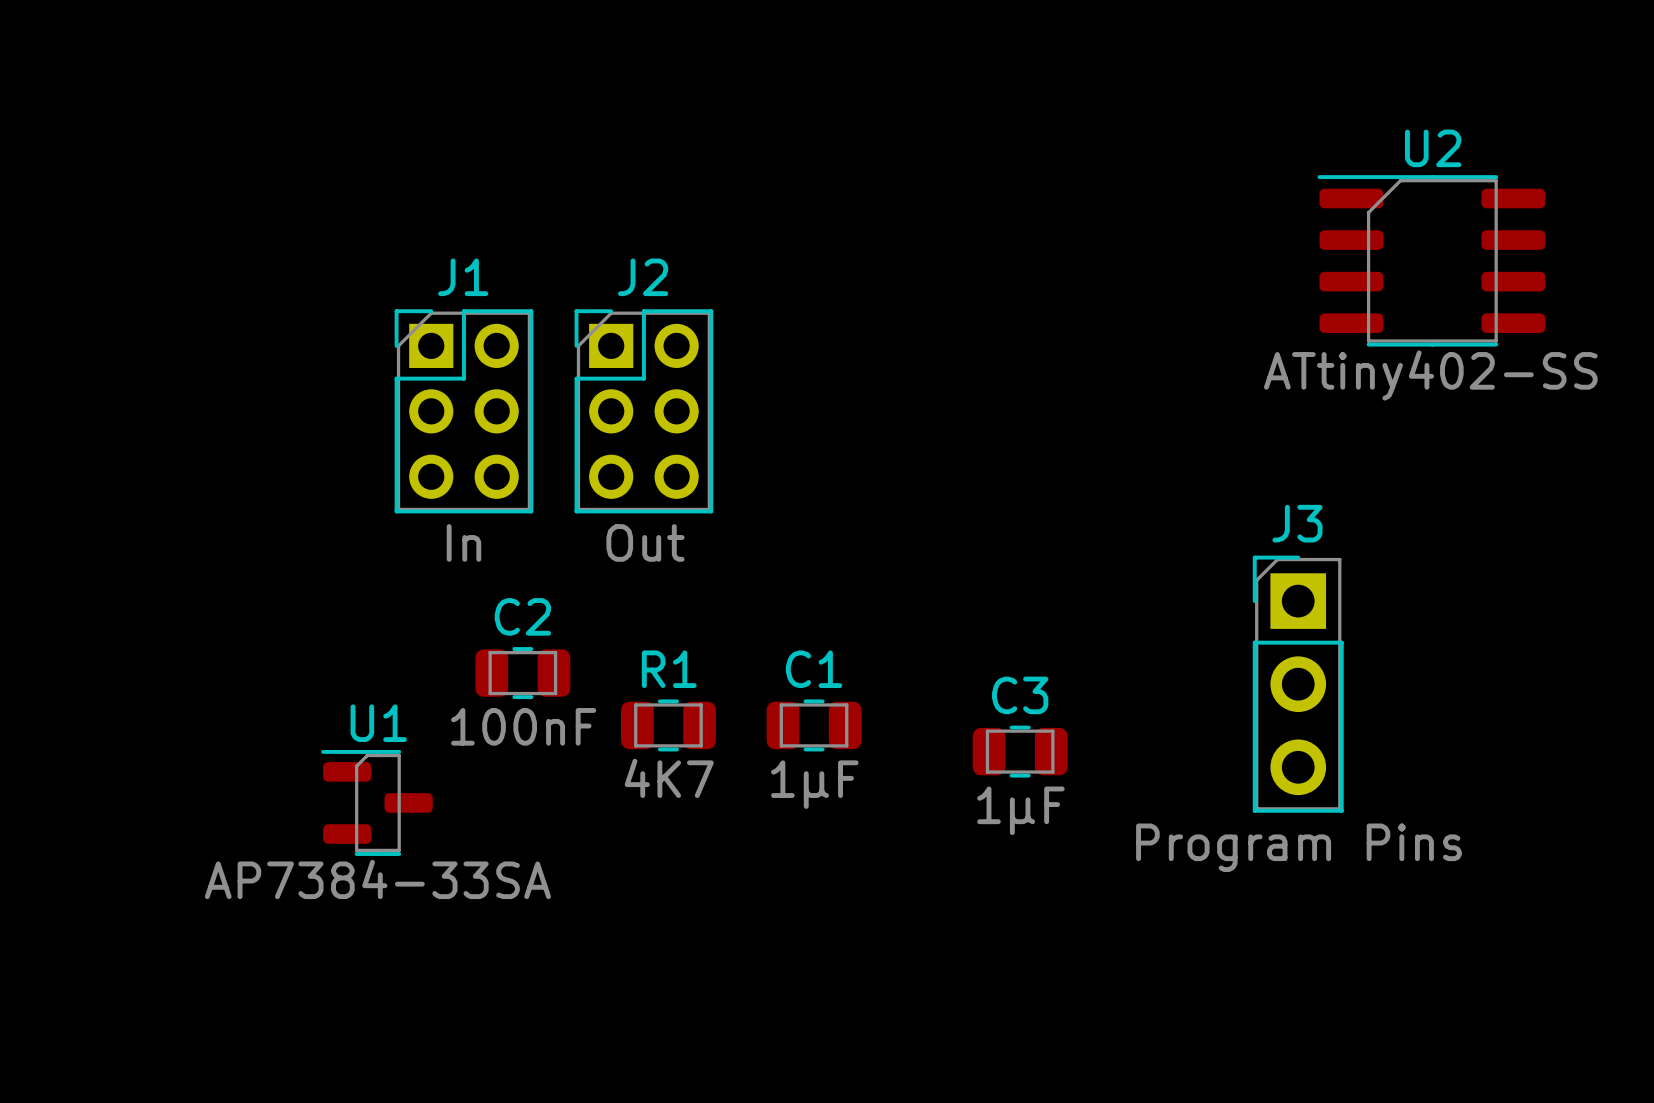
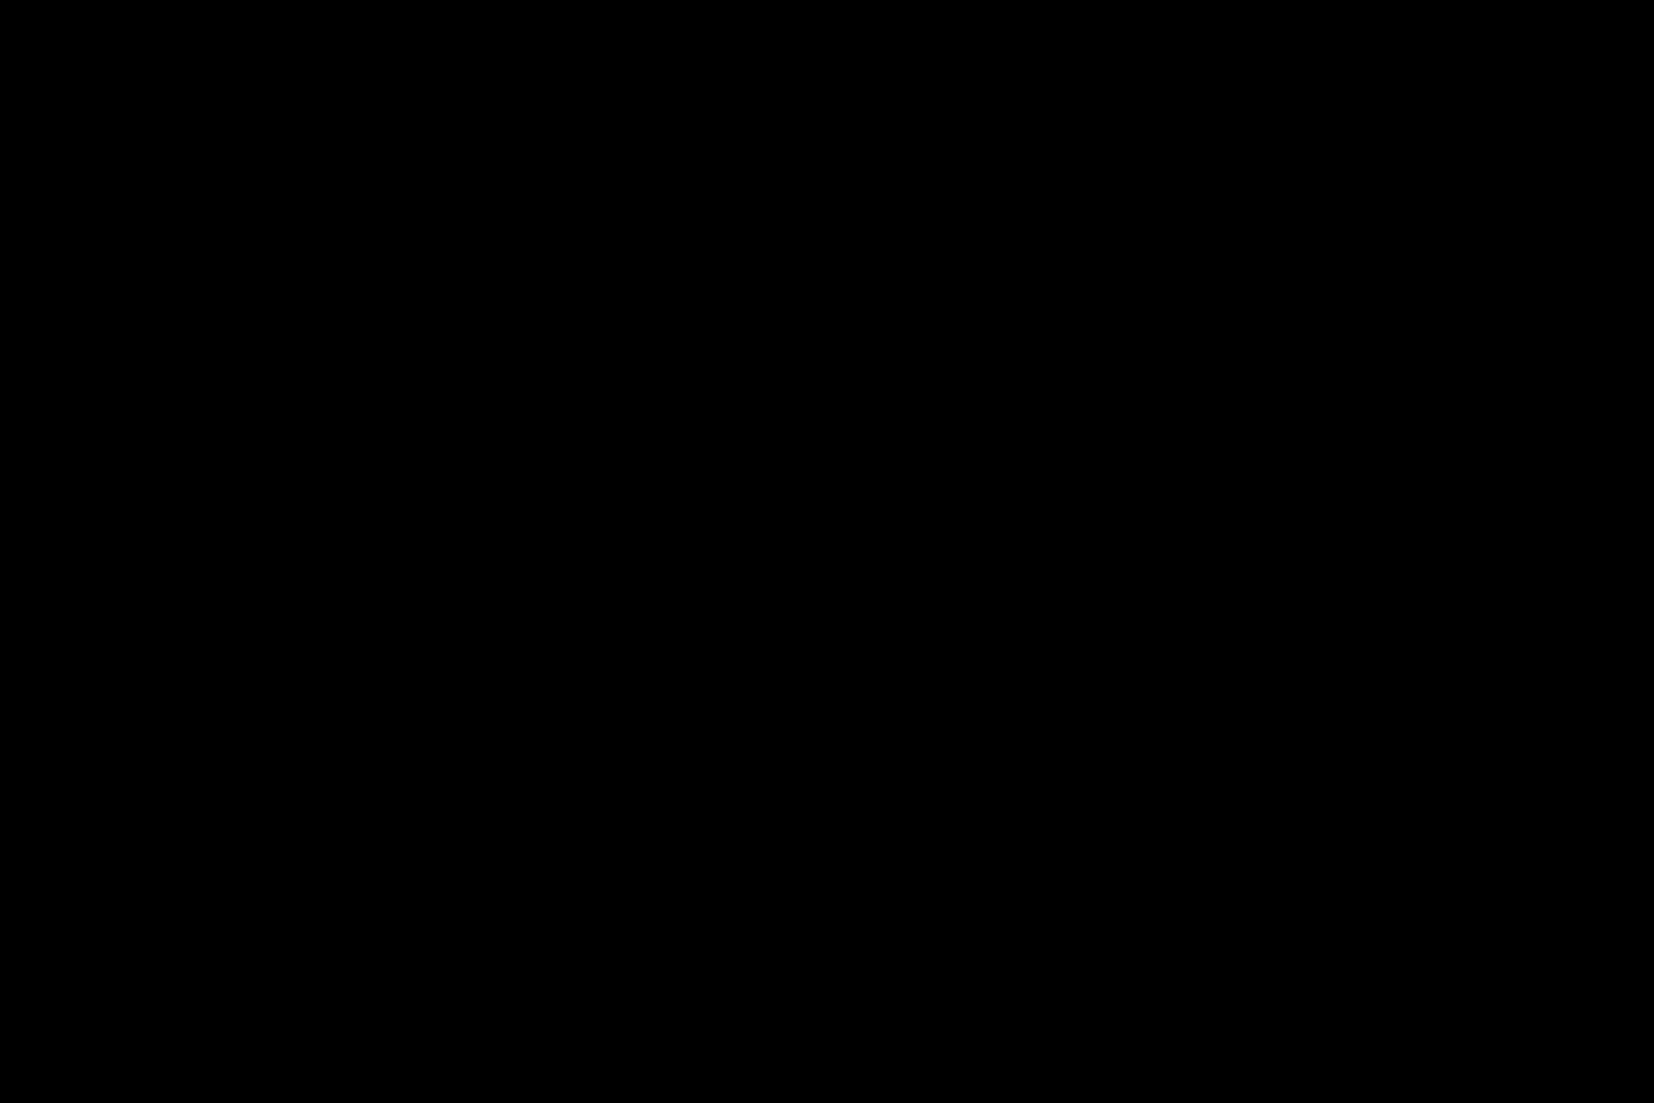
U2: ATtiny402-SS (1431, 260) -> none
J1: In (463, 411) -> none
J2: Out (643, 411) -> none
C2: 100nF (522, 673) -> none
J3: Program Pins (1298, 684) -> none
R1: 4K7 (668, 725) -> none
C1: 1µF (814, 725) -> none
C3: 1µF (1020, 751) -> none
U1: AP7384-33SA (376, 802) -> none

